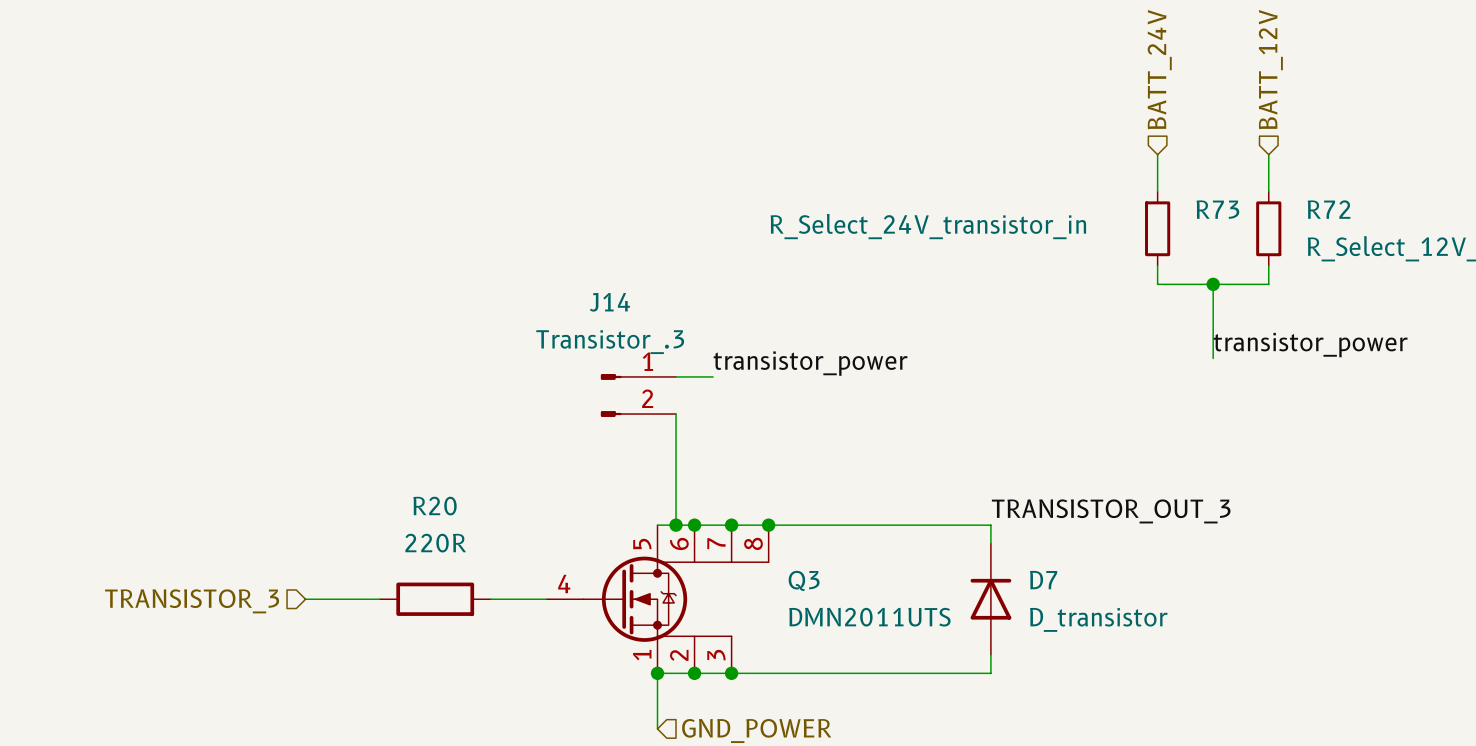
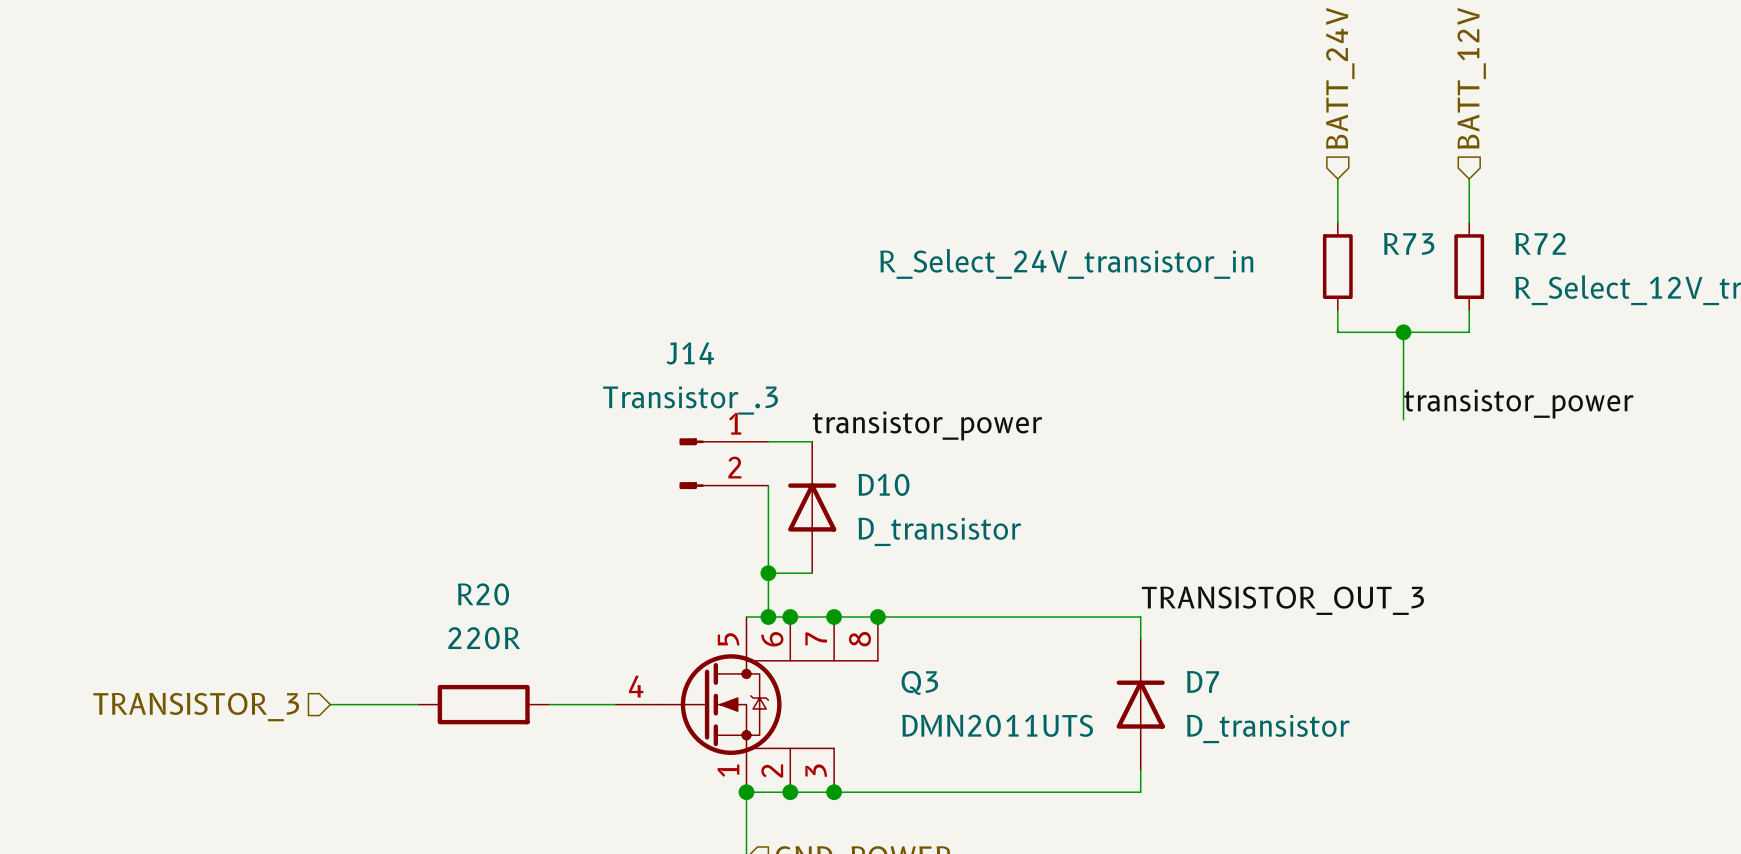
D10: none -> D_transistor (812, 507)
wire: none -> (768, 573) (812, 573)
junction: none -> (768, 573)

